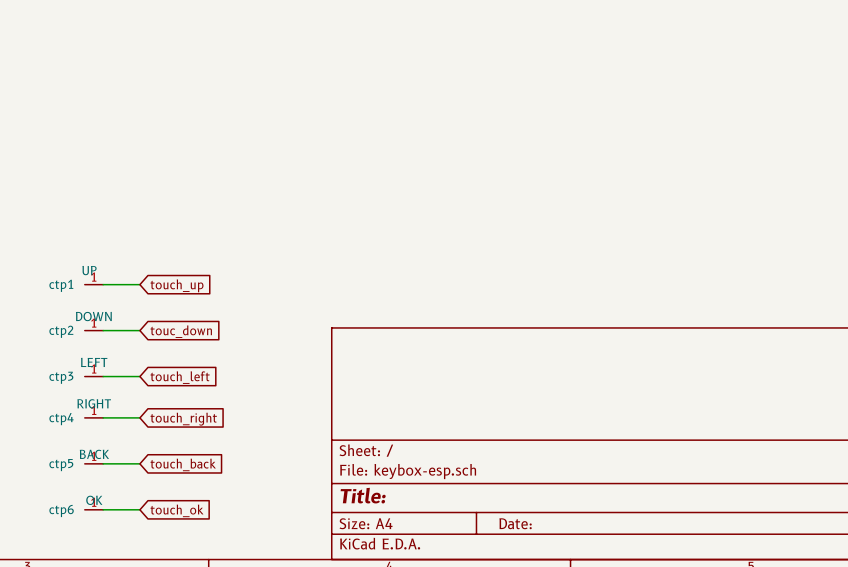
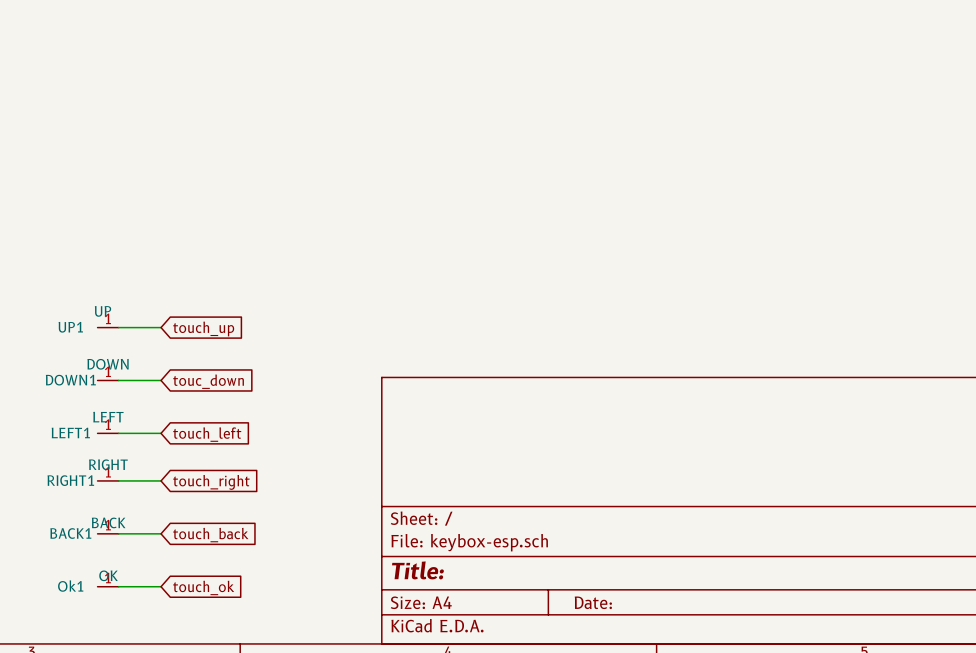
ctp1 name: ctp1 (61, 285) -> UP1 (70, 327)
ctp2 name: ctp2 (61, 331) -> DOWN1 (70, 380)
ctp3 name: ctp3 (61, 377) -> LEFT1 (70, 432)
ctp4 name: ctp4 (61, 419) -> RIGHT1 (70, 480)
ctp5 name: ctp5 (61, 465) -> BACK1 (70, 533)
ctp6 name: ctp6 (61, 510) -> Ok1 (70, 586)

